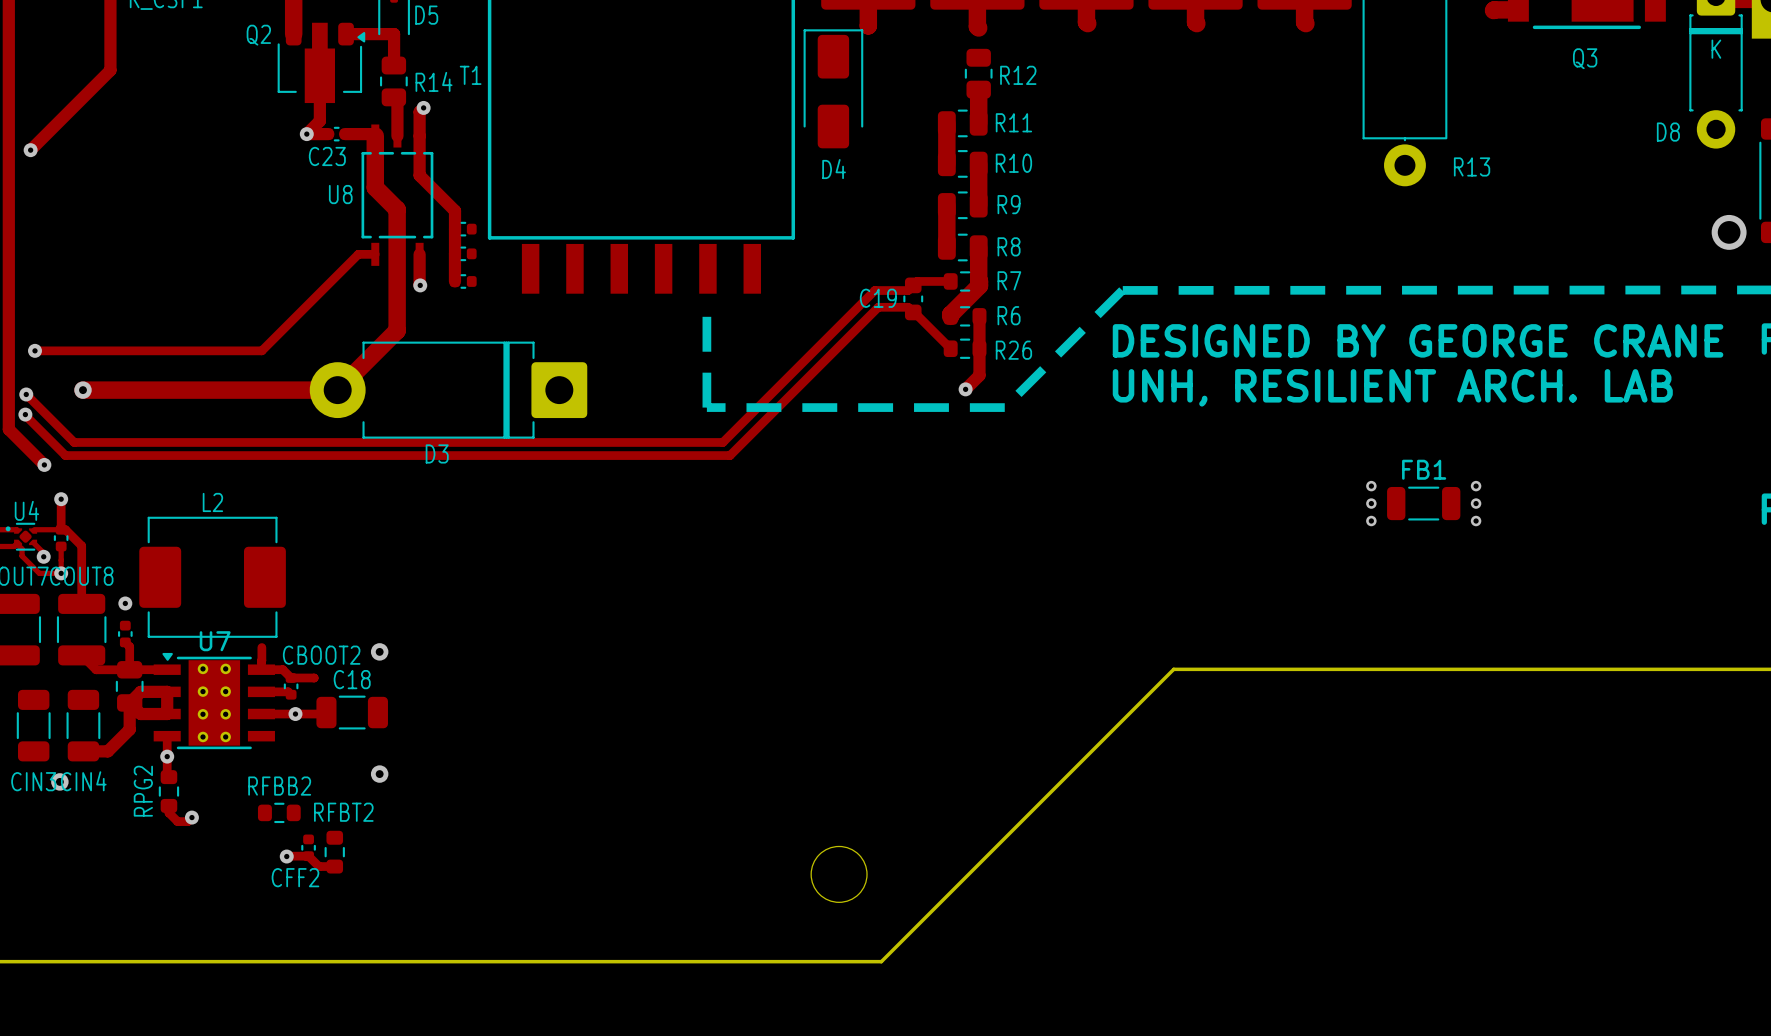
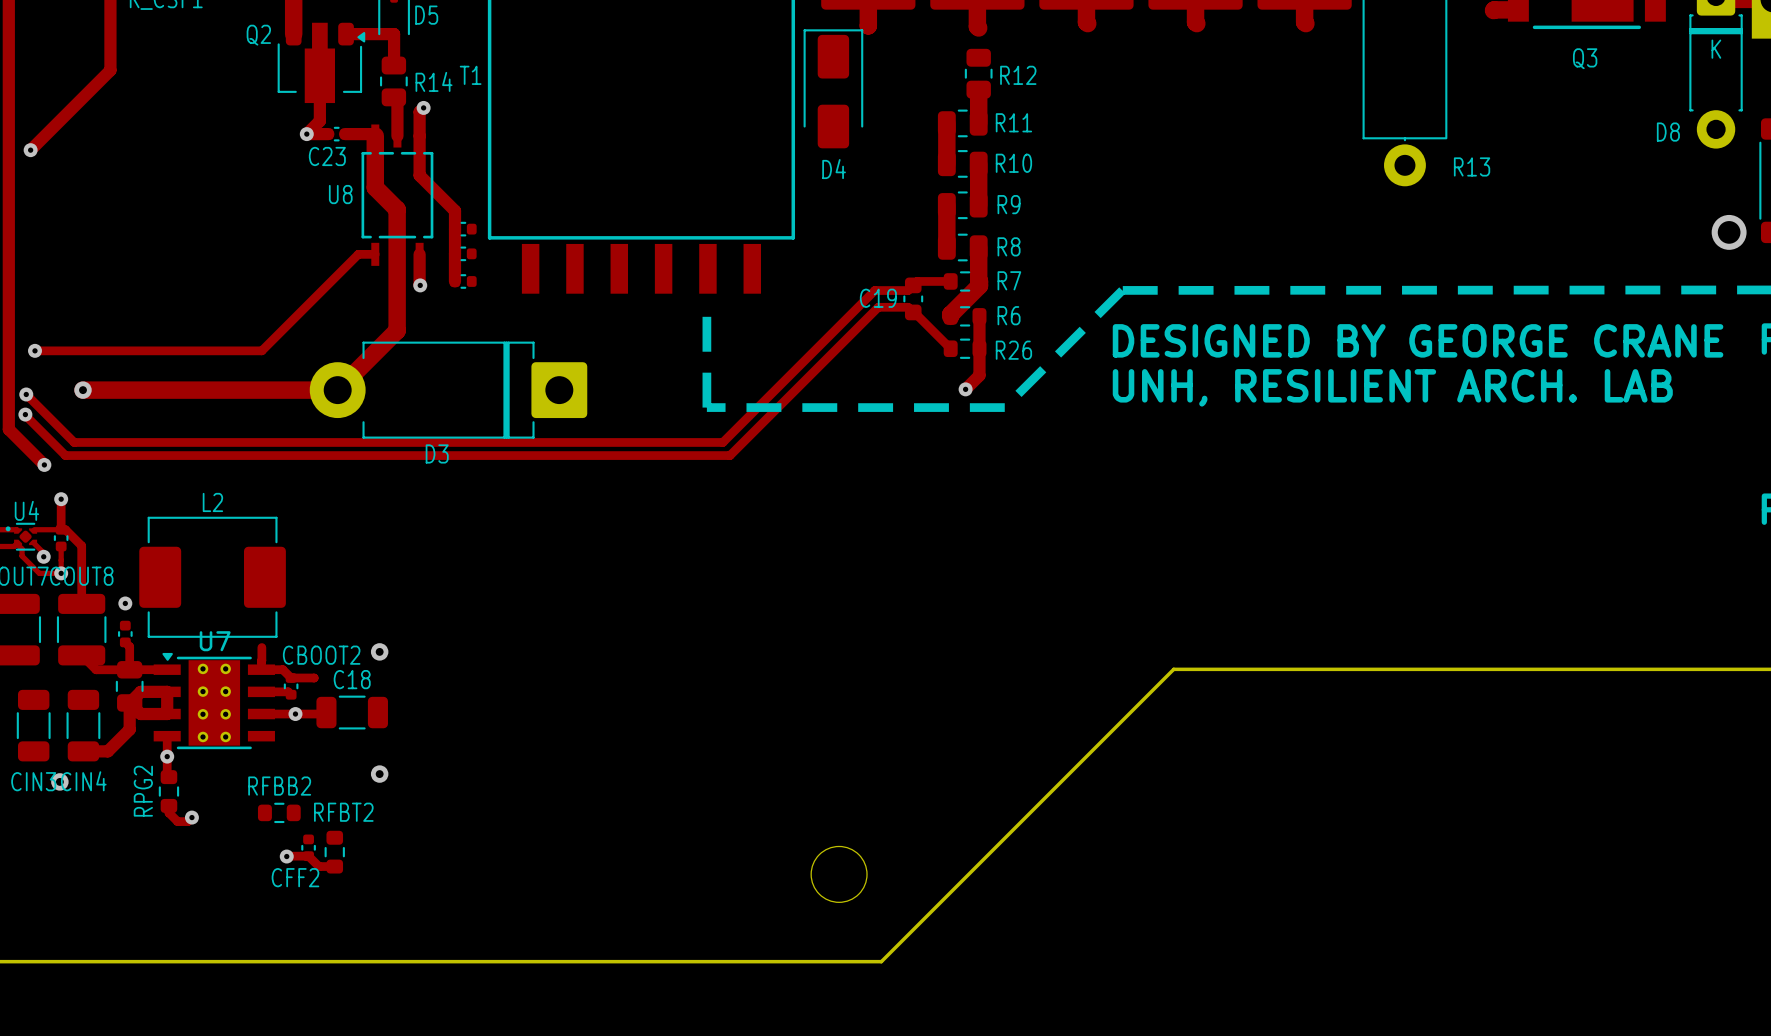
via: (1371, 486) -> none
via: (1476, 486) -> none
via: (1371, 503) -> none
FB1: (1423, 503) -> none
via: (1476, 503) -> none
via: (1371, 521) -> none
via: (1476, 521) -> none

